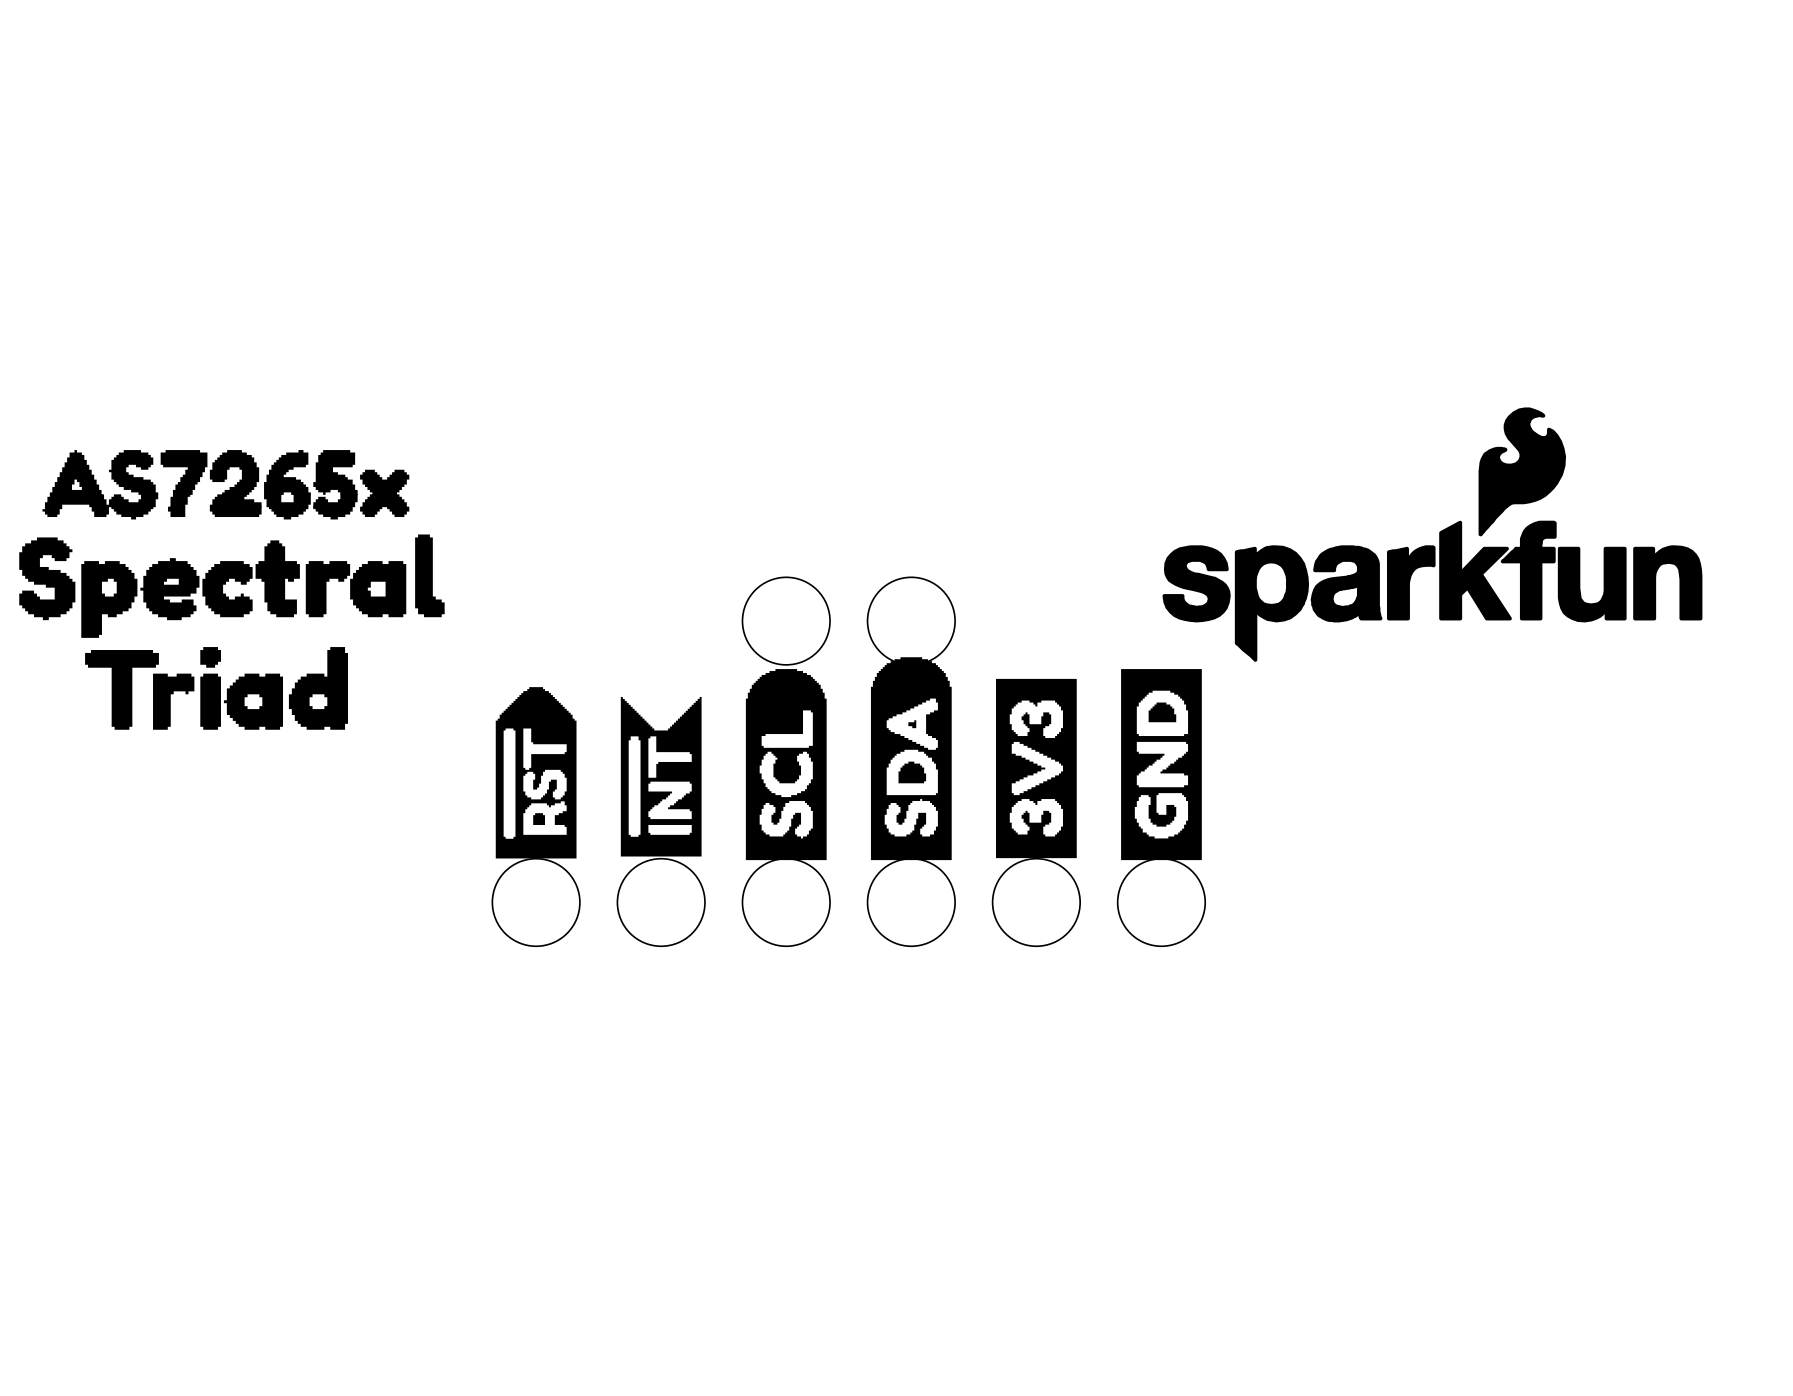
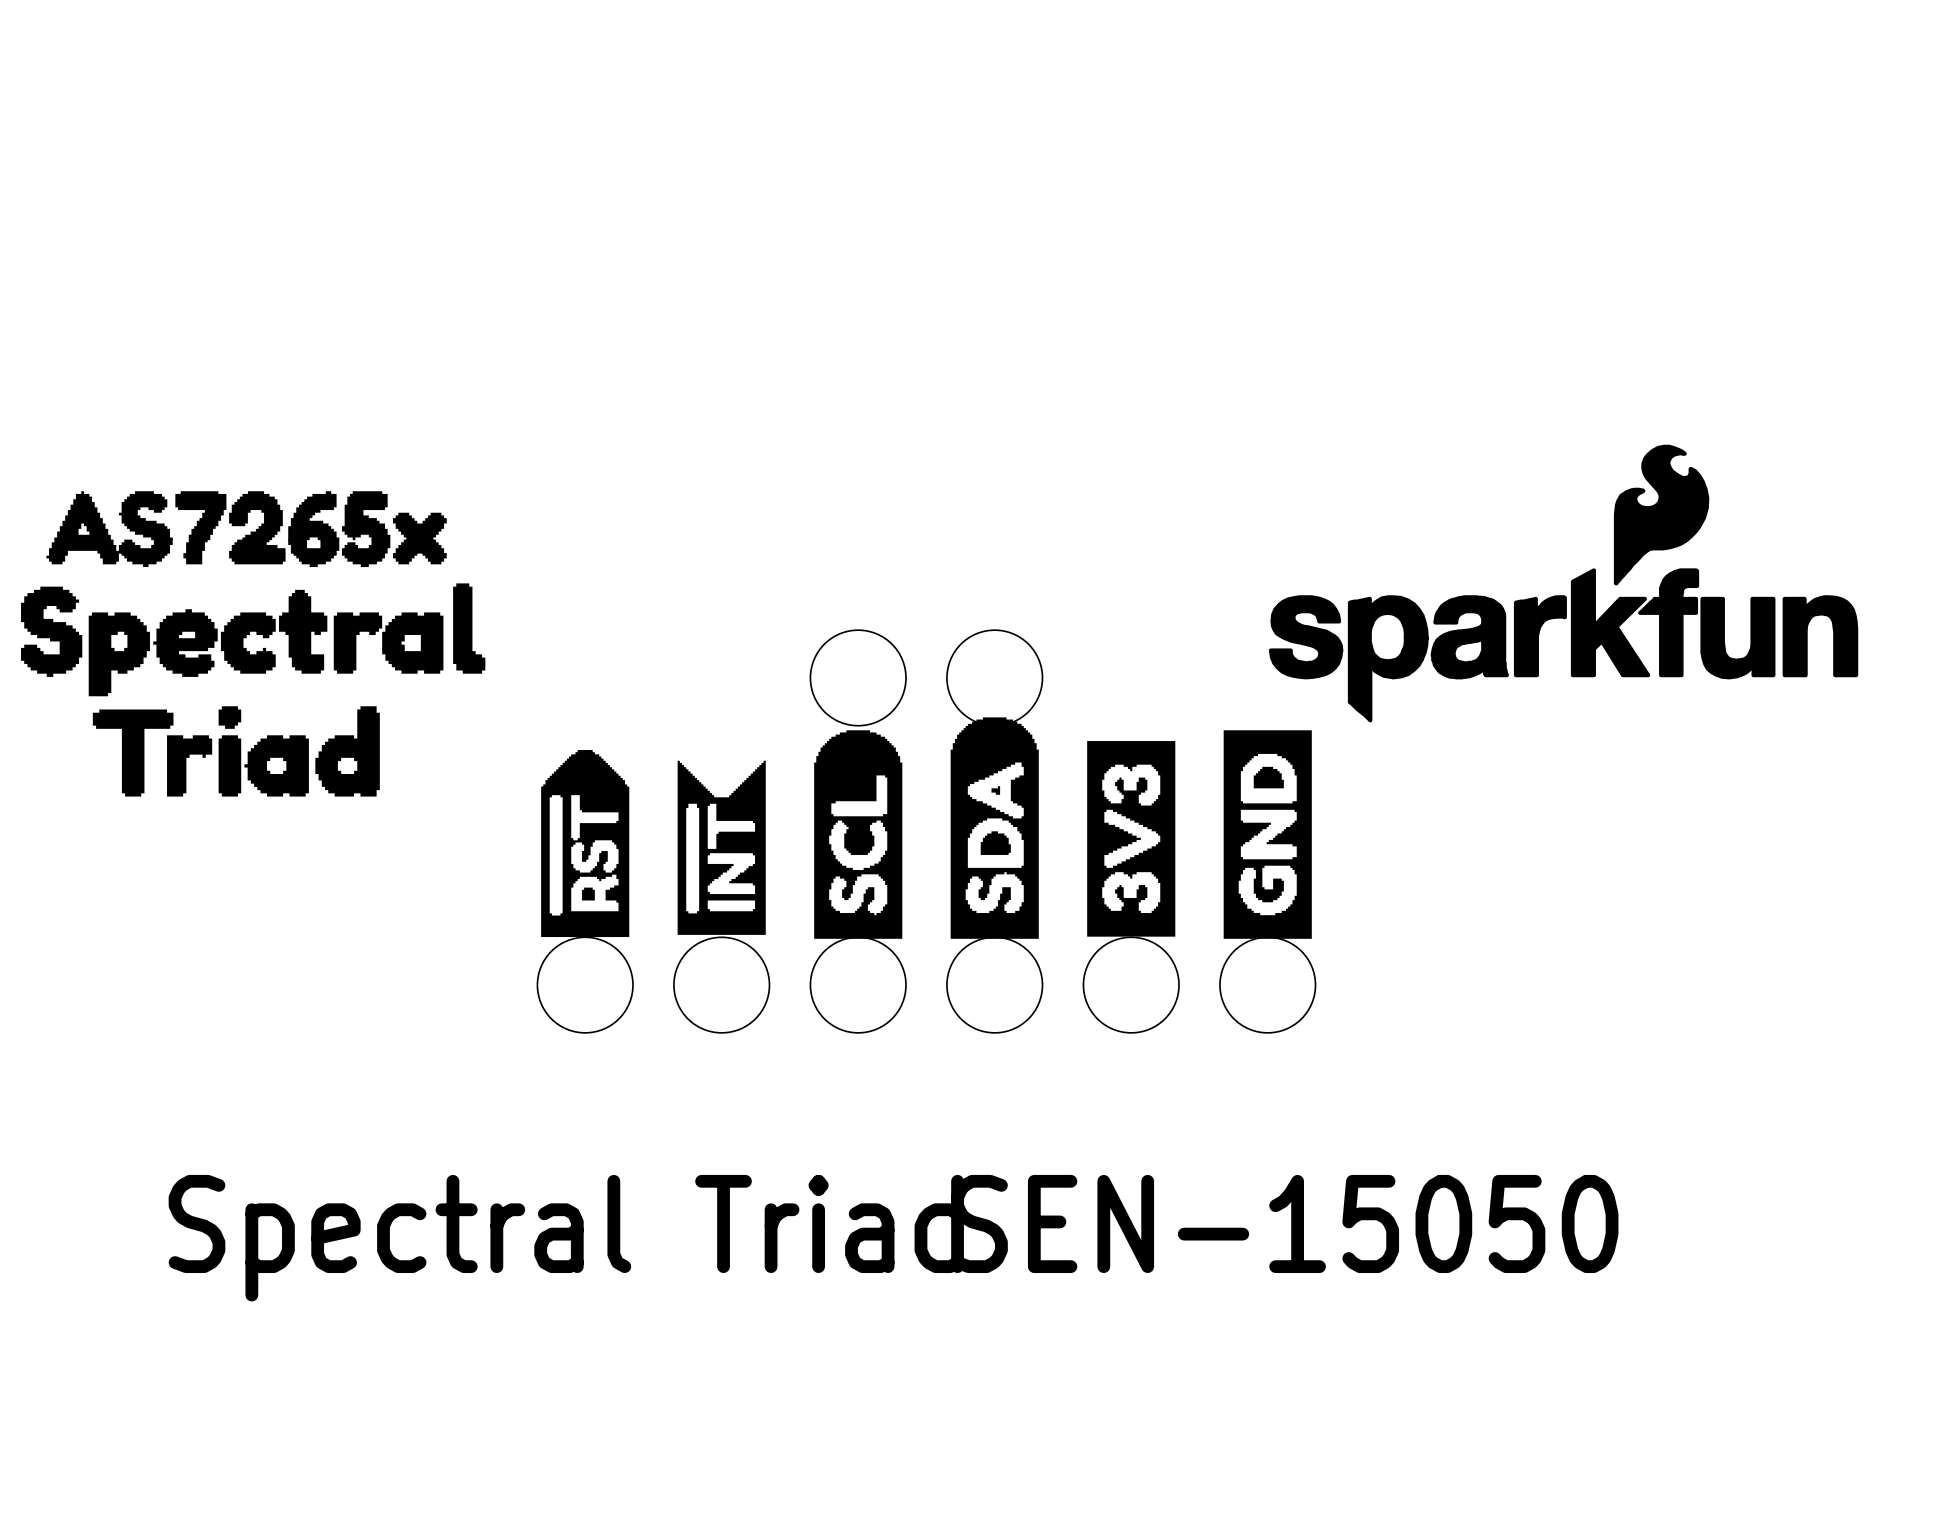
text: none -> SEN-15050 (1284, 1223)
text: none -> Spectral Triad (566, 1238)

